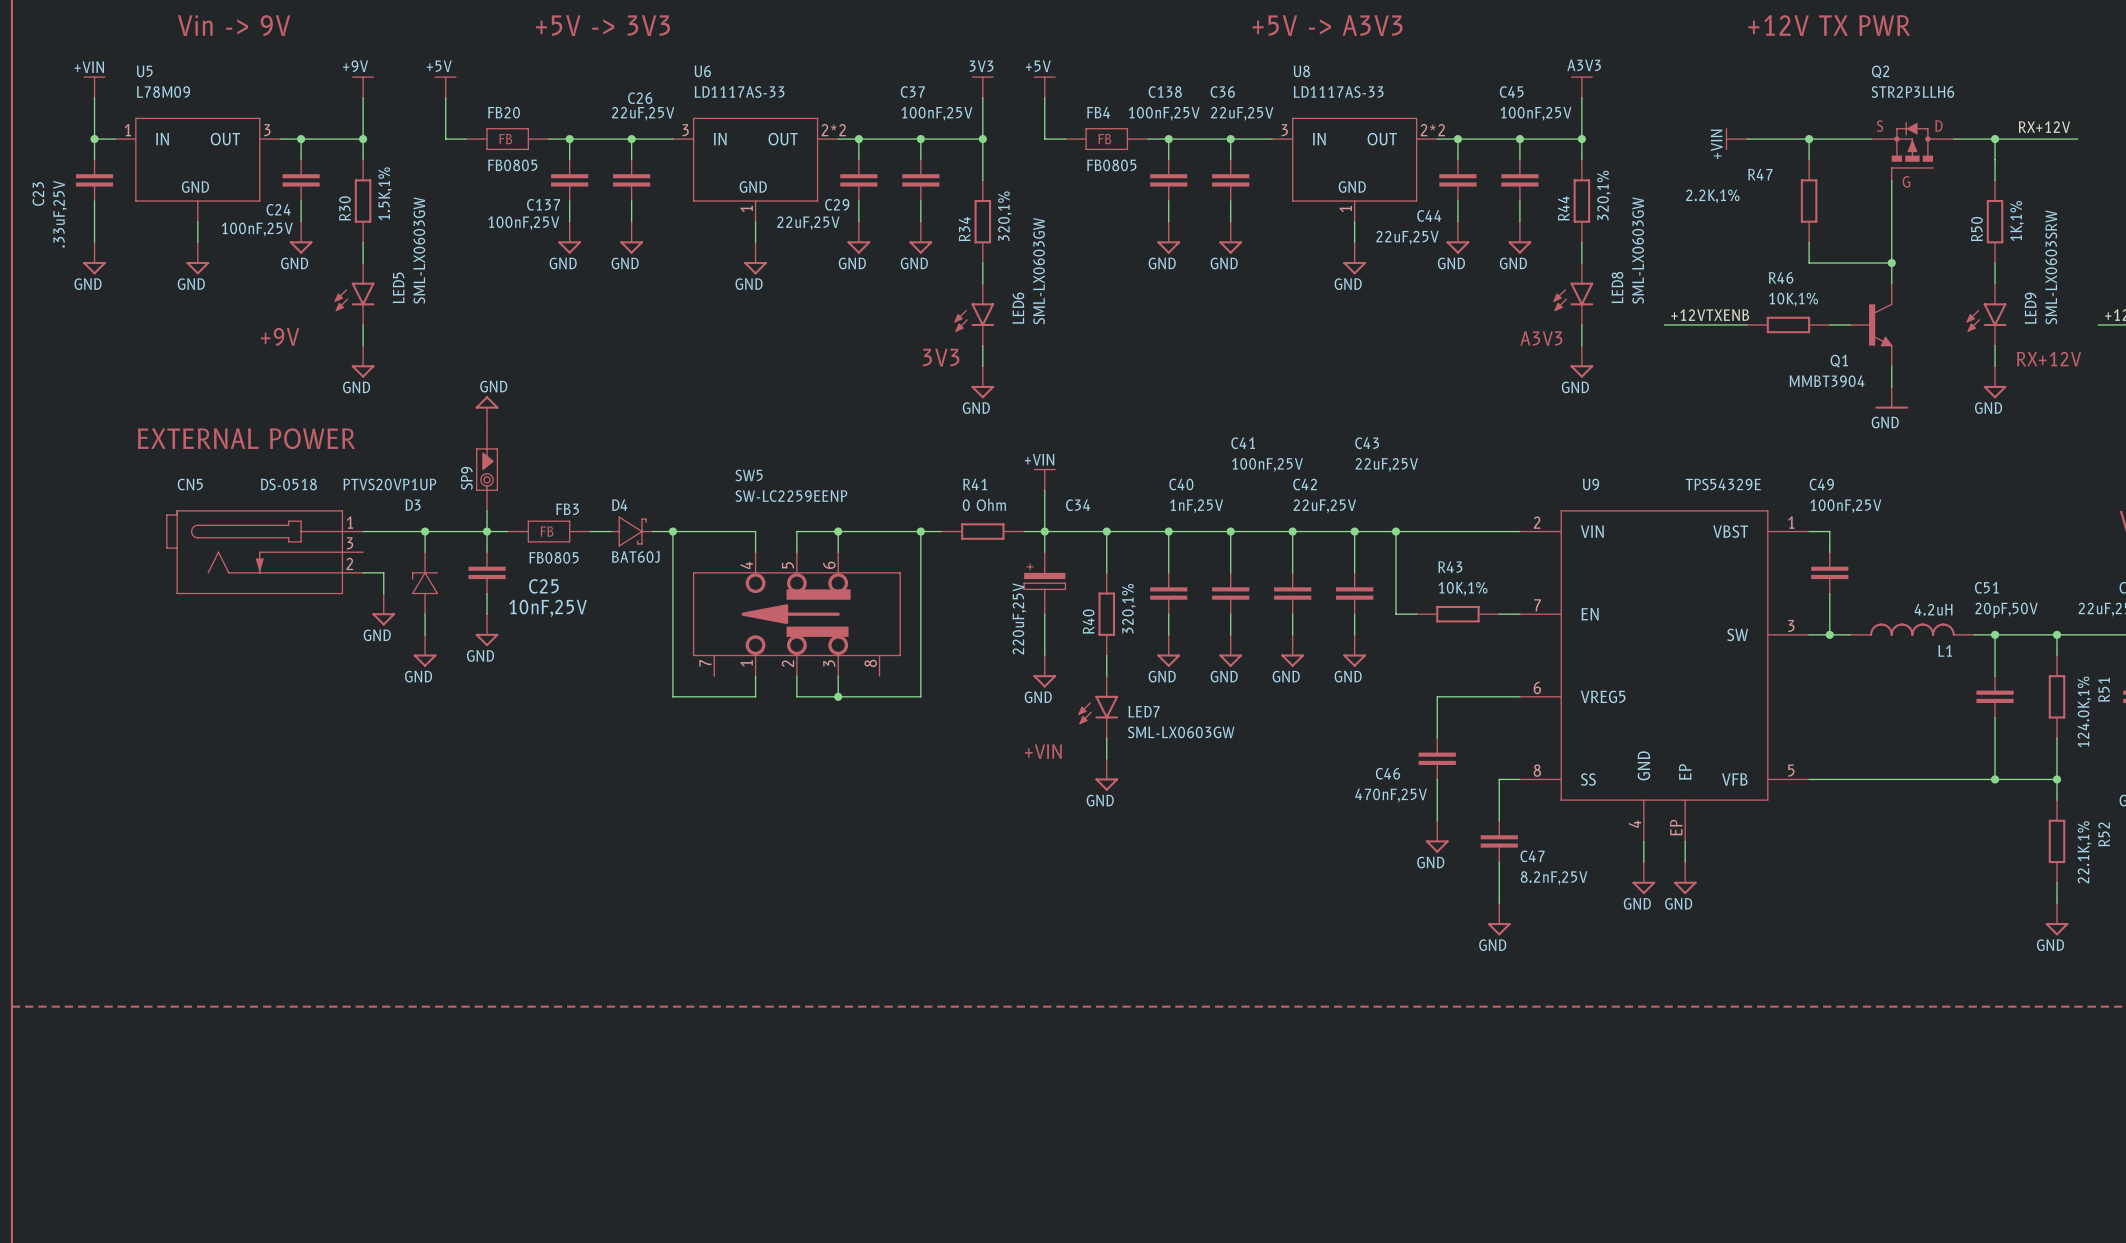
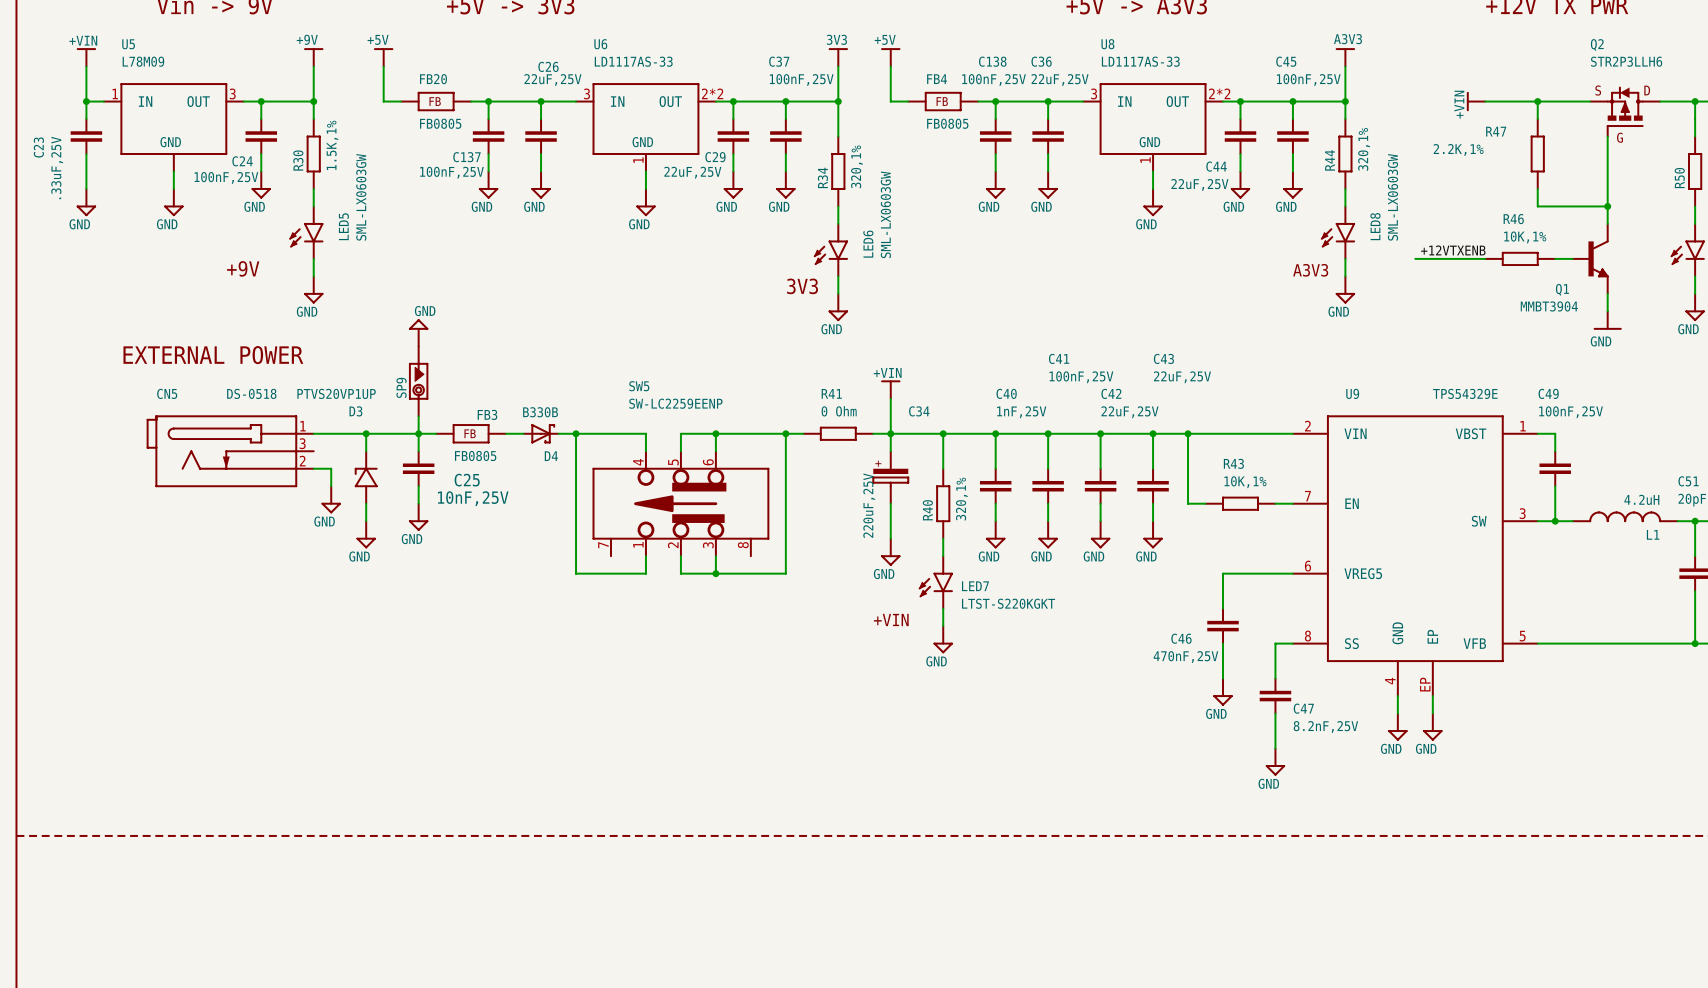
D4 name position: D4 (619, 505) -> D4 (551, 456)
D4 symbol: [610, 516, 653, 547] -> [523, 424, 559, 444]
D4 value: BAT60J (635, 557) -> B330B (540, 412)
LED7 value: SML-LX0603GW (1181, 732) -> LTST-S220KGKT (1008, 603)

